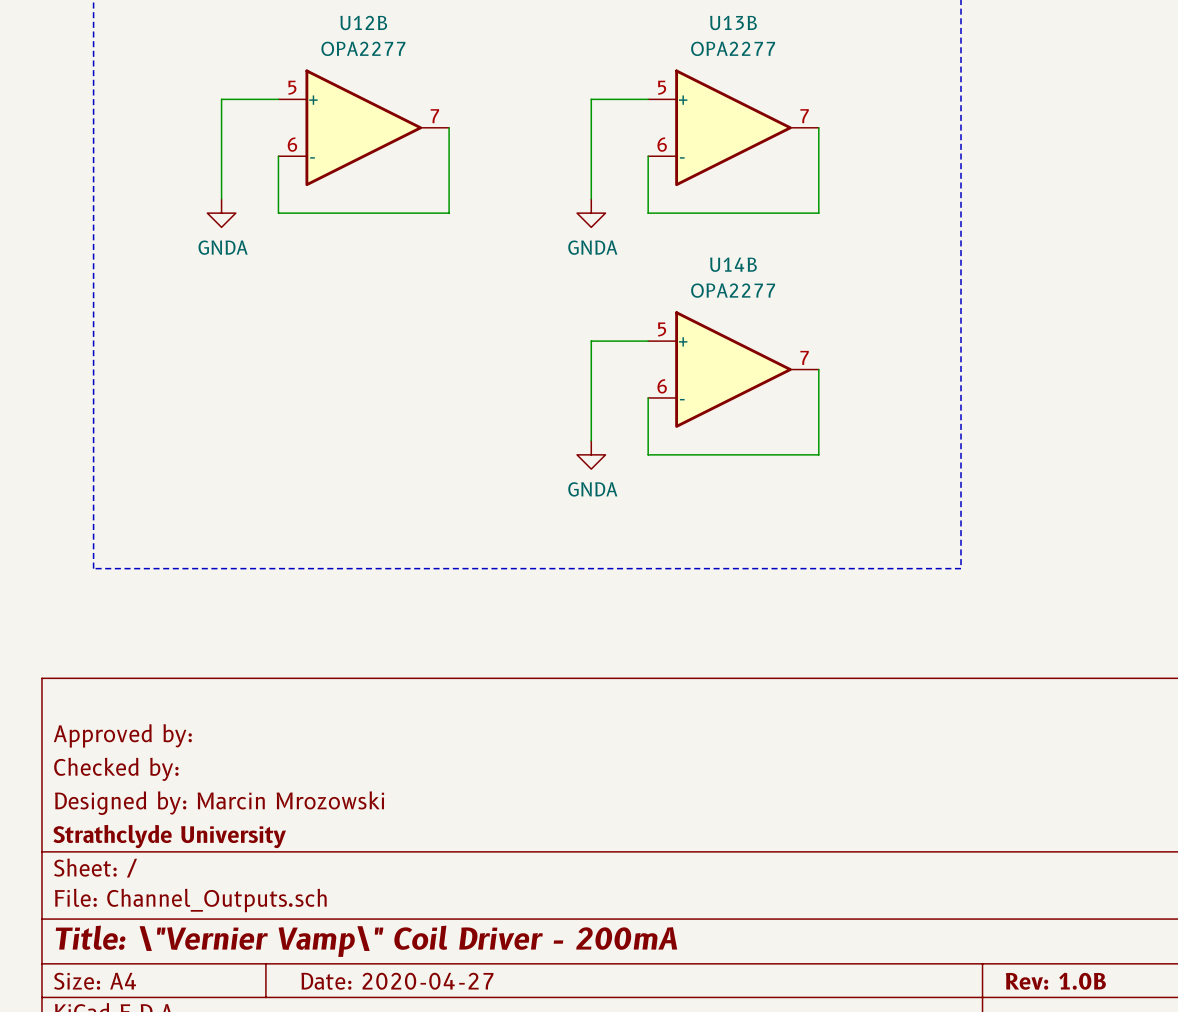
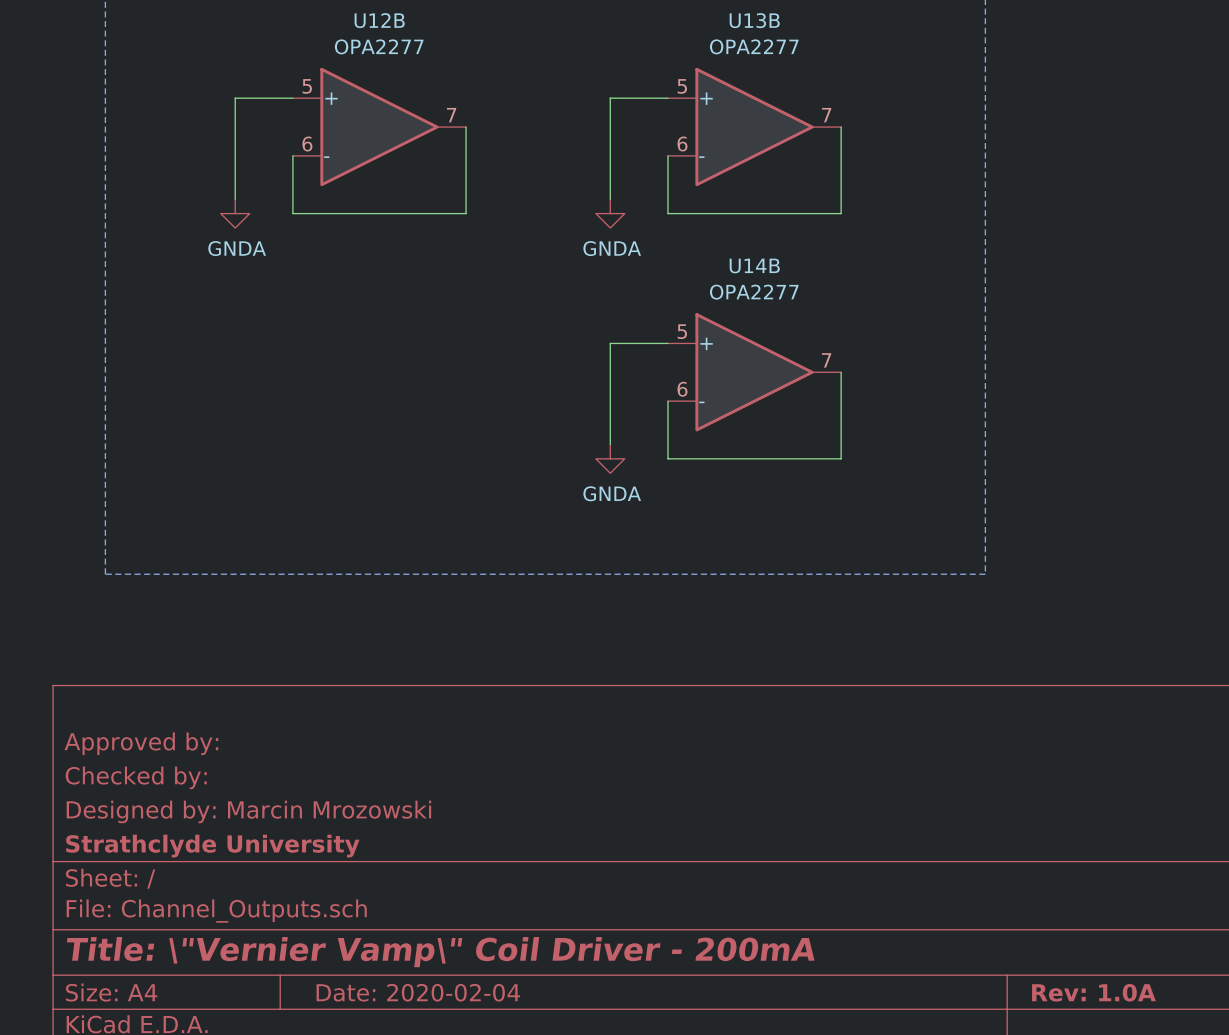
title block: Date: 2020-04-27 (397, 981) -> Date: 2020-02-04 (418, 992)
title block: Rev: 1.0B (1055, 981) -> Rev: 1.0A (1093, 992)

